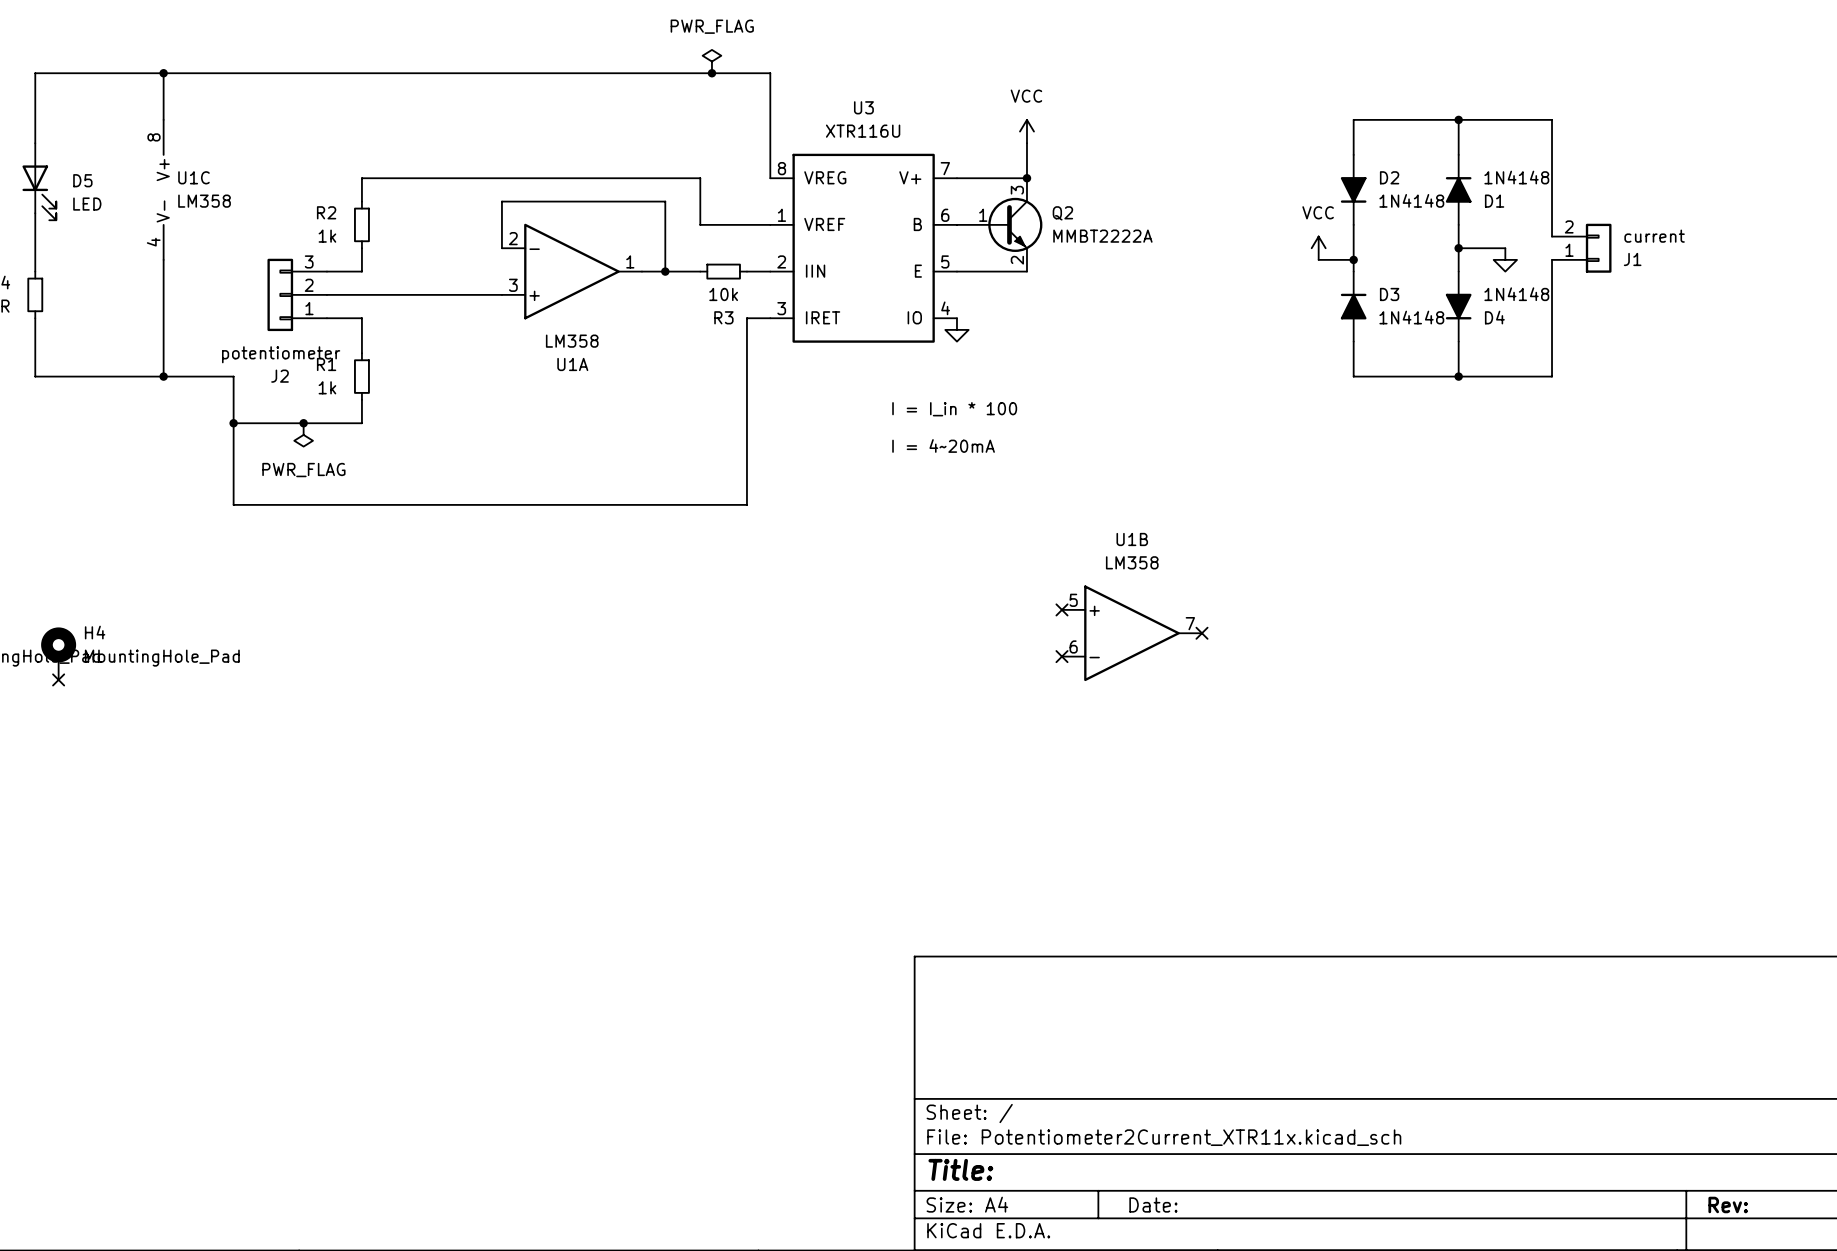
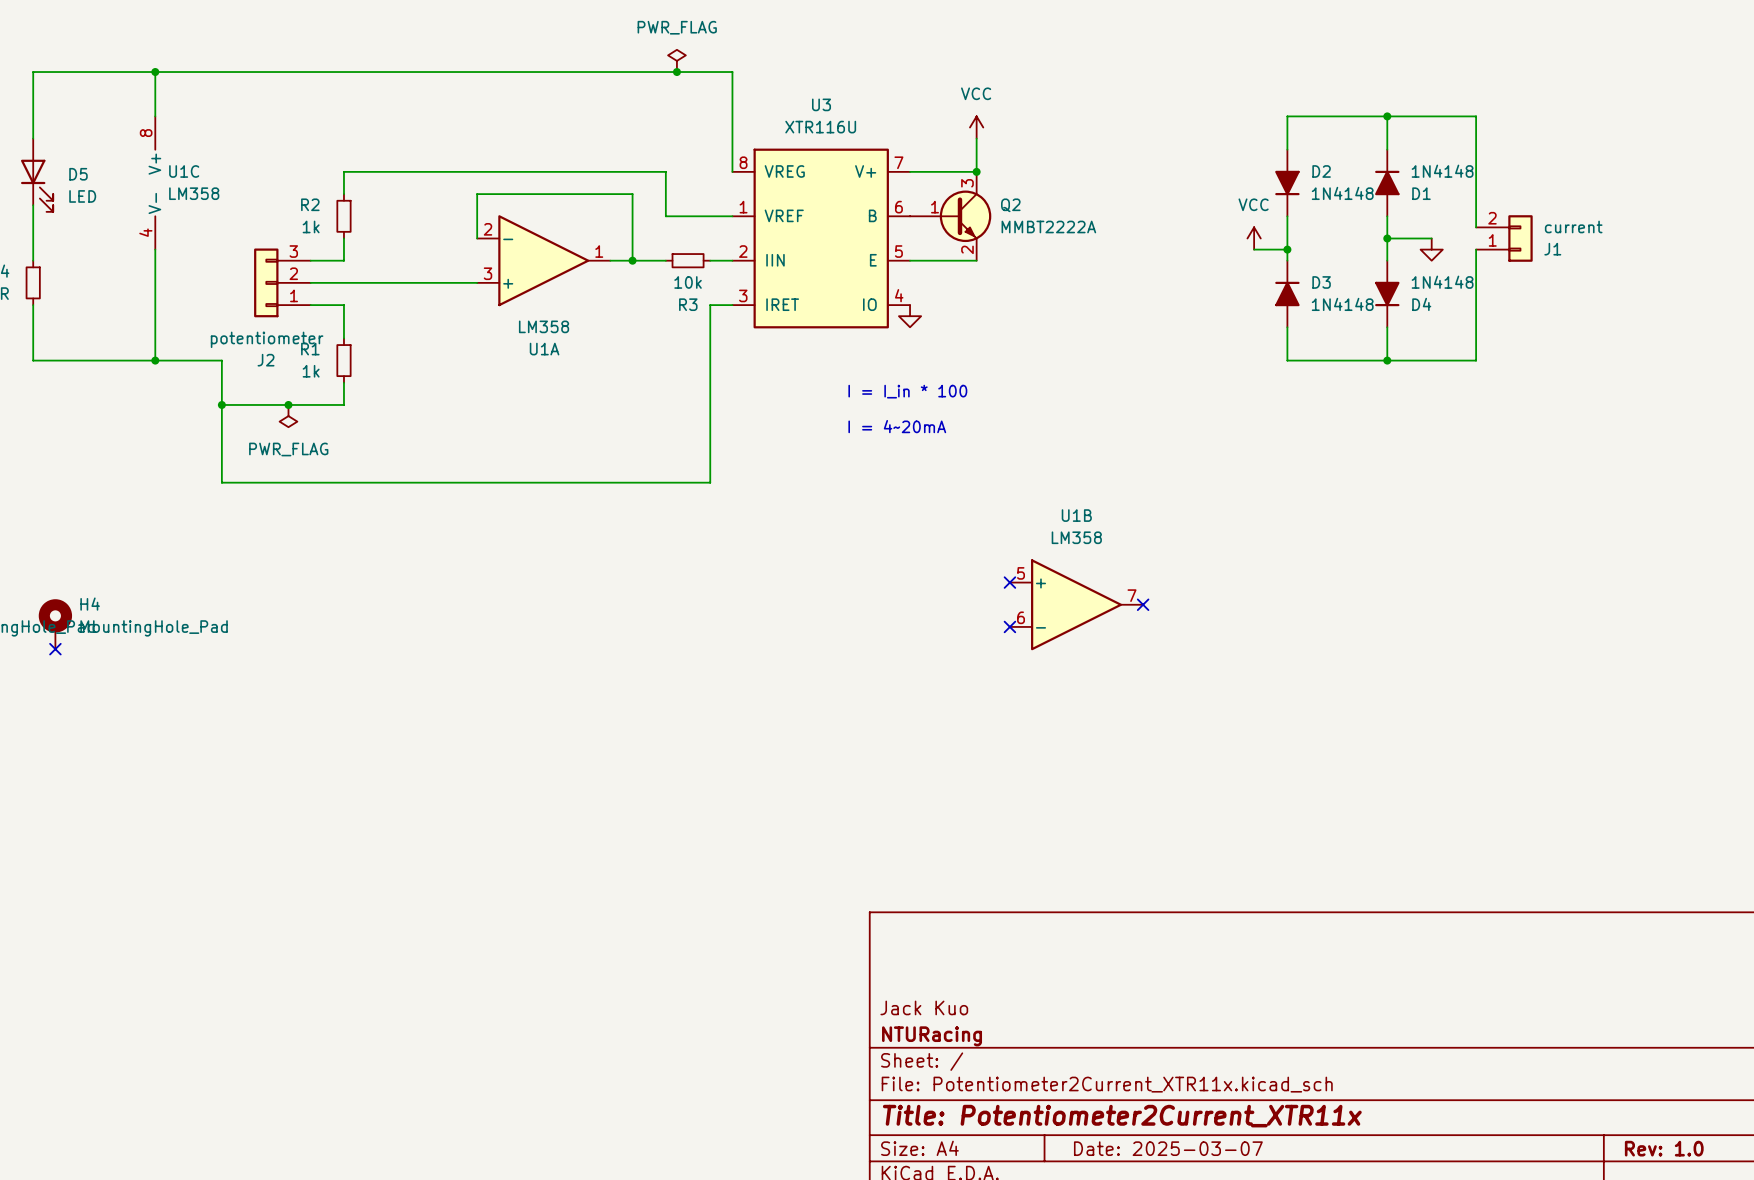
title block: none -> Jack Kuo (924, 1007)
title block: none -> NTURacing (932, 1036)
title block: Title: (960, 1169) -> Title: Potentiometer2Current_XTR11x (1122, 1116)
title block: Date: (1153, 1204) -> Date: 2025-03-07 (1168, 1148)
title block: Rev: (1728, 1204) -> Rev: 1.0 (1664, 1148)

